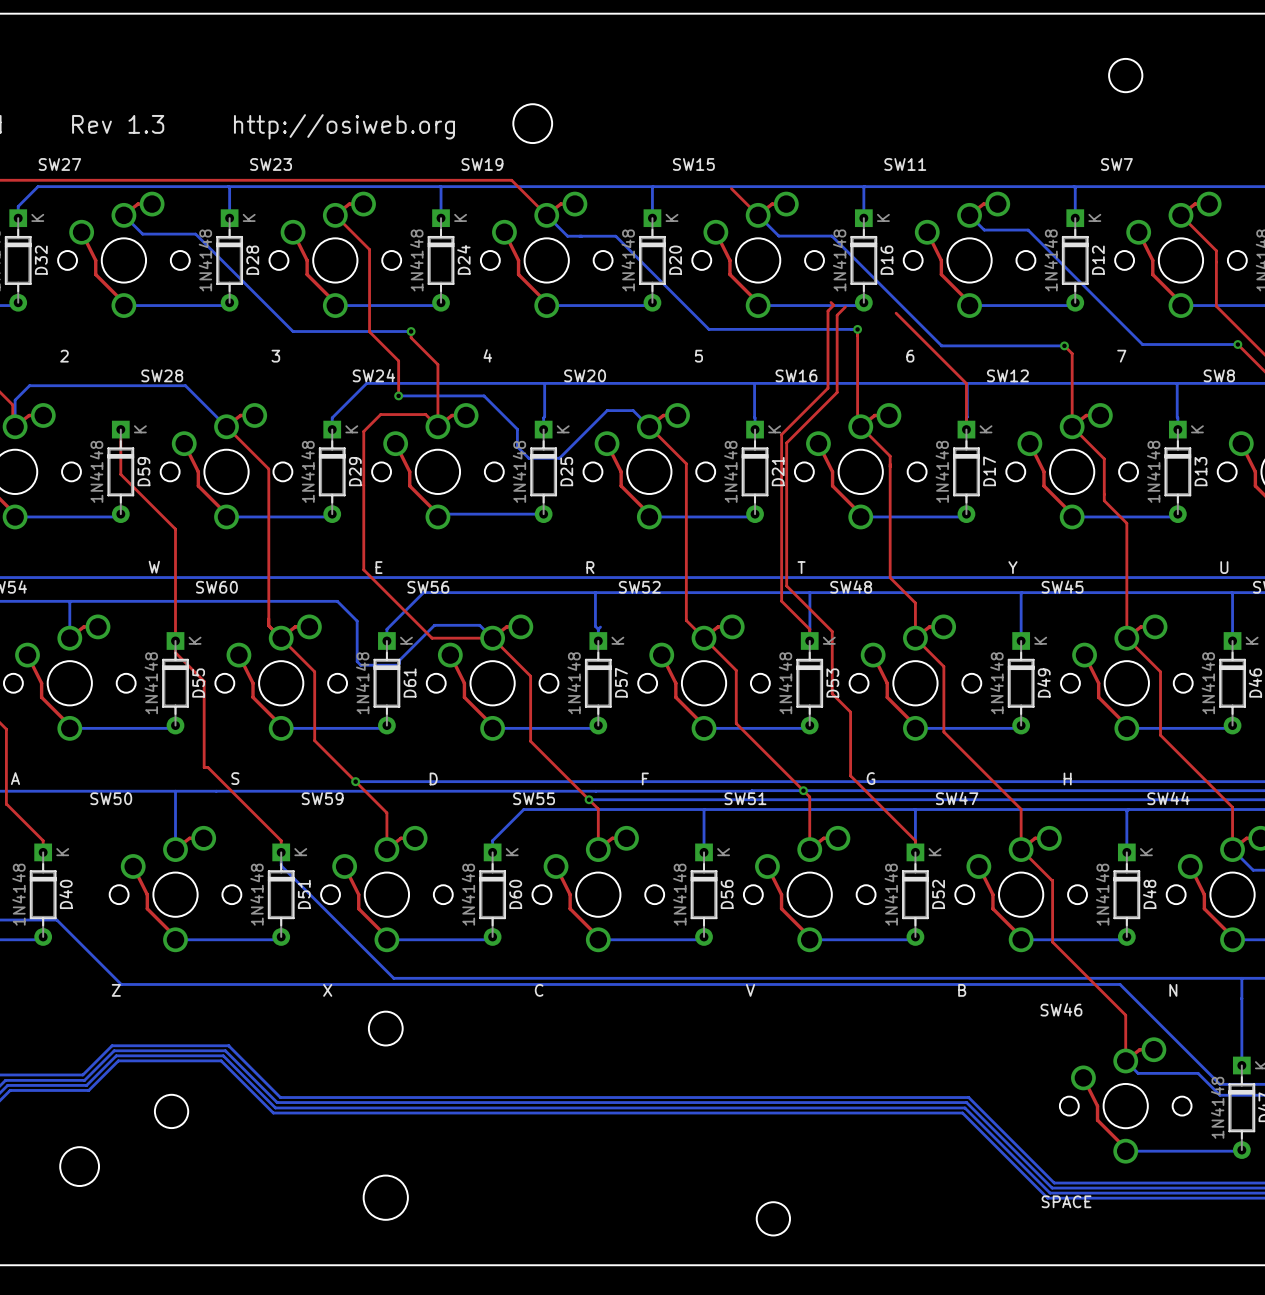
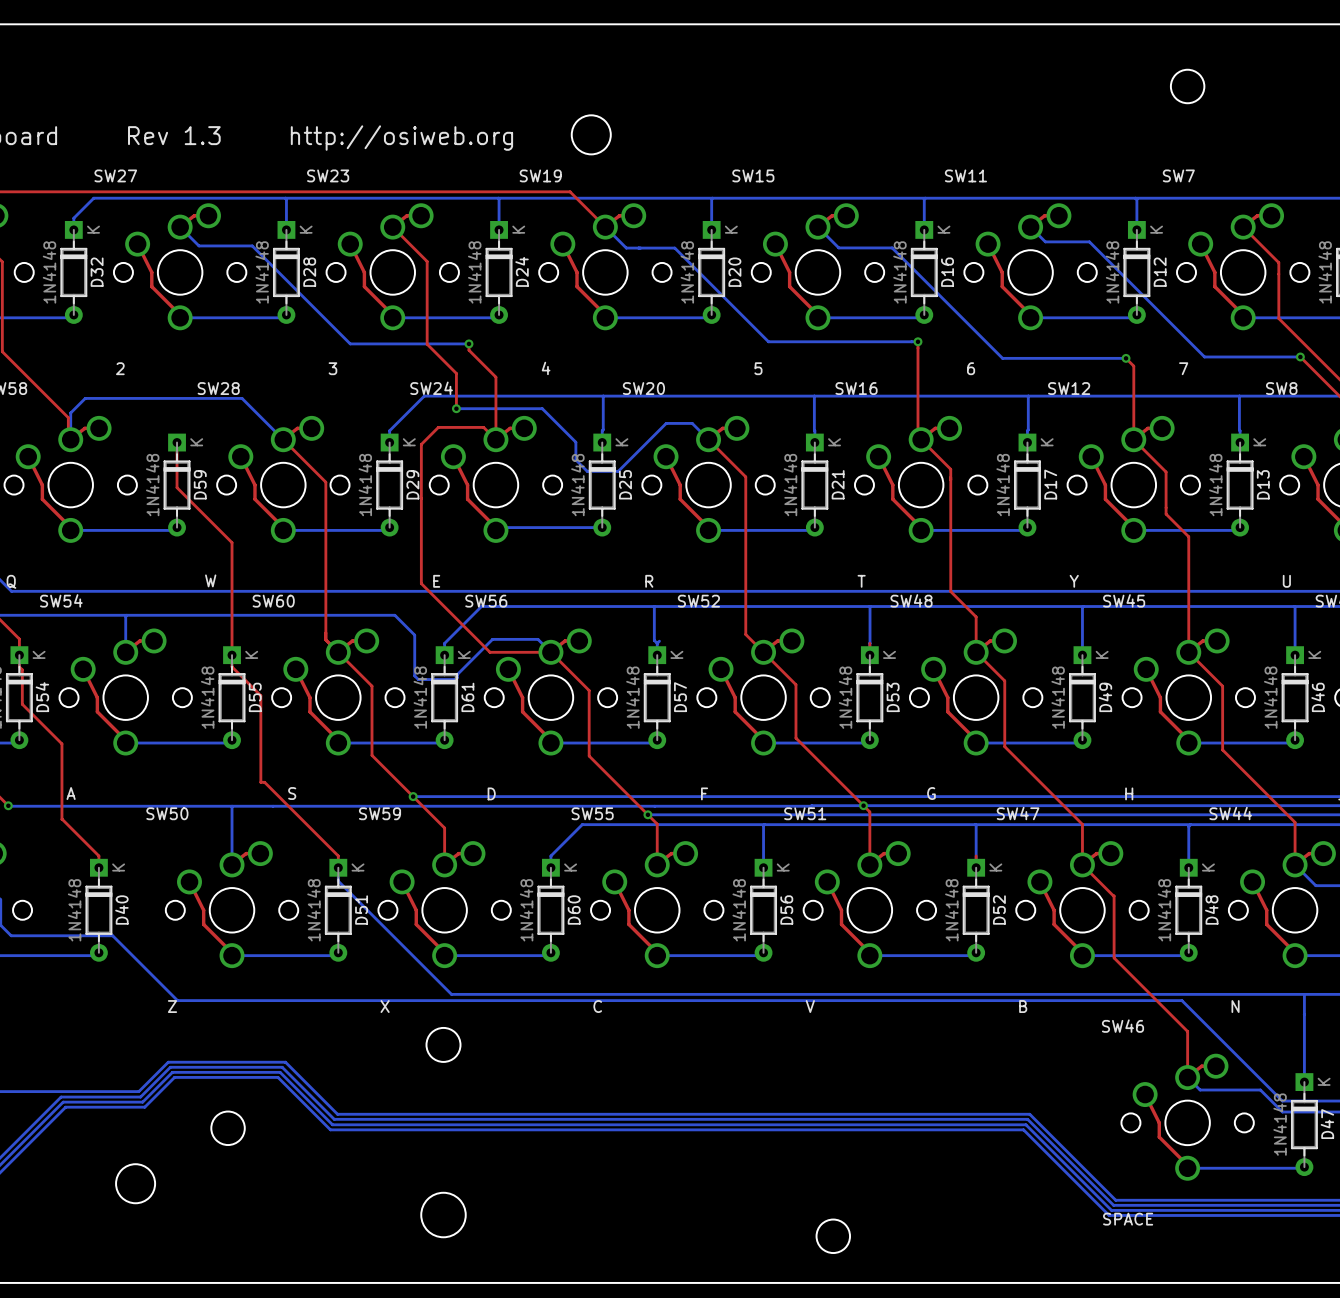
top track: (731, 188) (758, 215) -> none
top track: (831, 302) (833, 305) (827, 311) (827, 388) (781, 434) (781, 601) (809, 629) -> none
top track: (845, 307) (837, 315) (837, 392) (786, 442) (786, 585) (832, 631) (832, 693) (850, 712) (850, 775) (915, 840) -> none
top track: (896, 313) (966, 383) (966, 429) -> none

